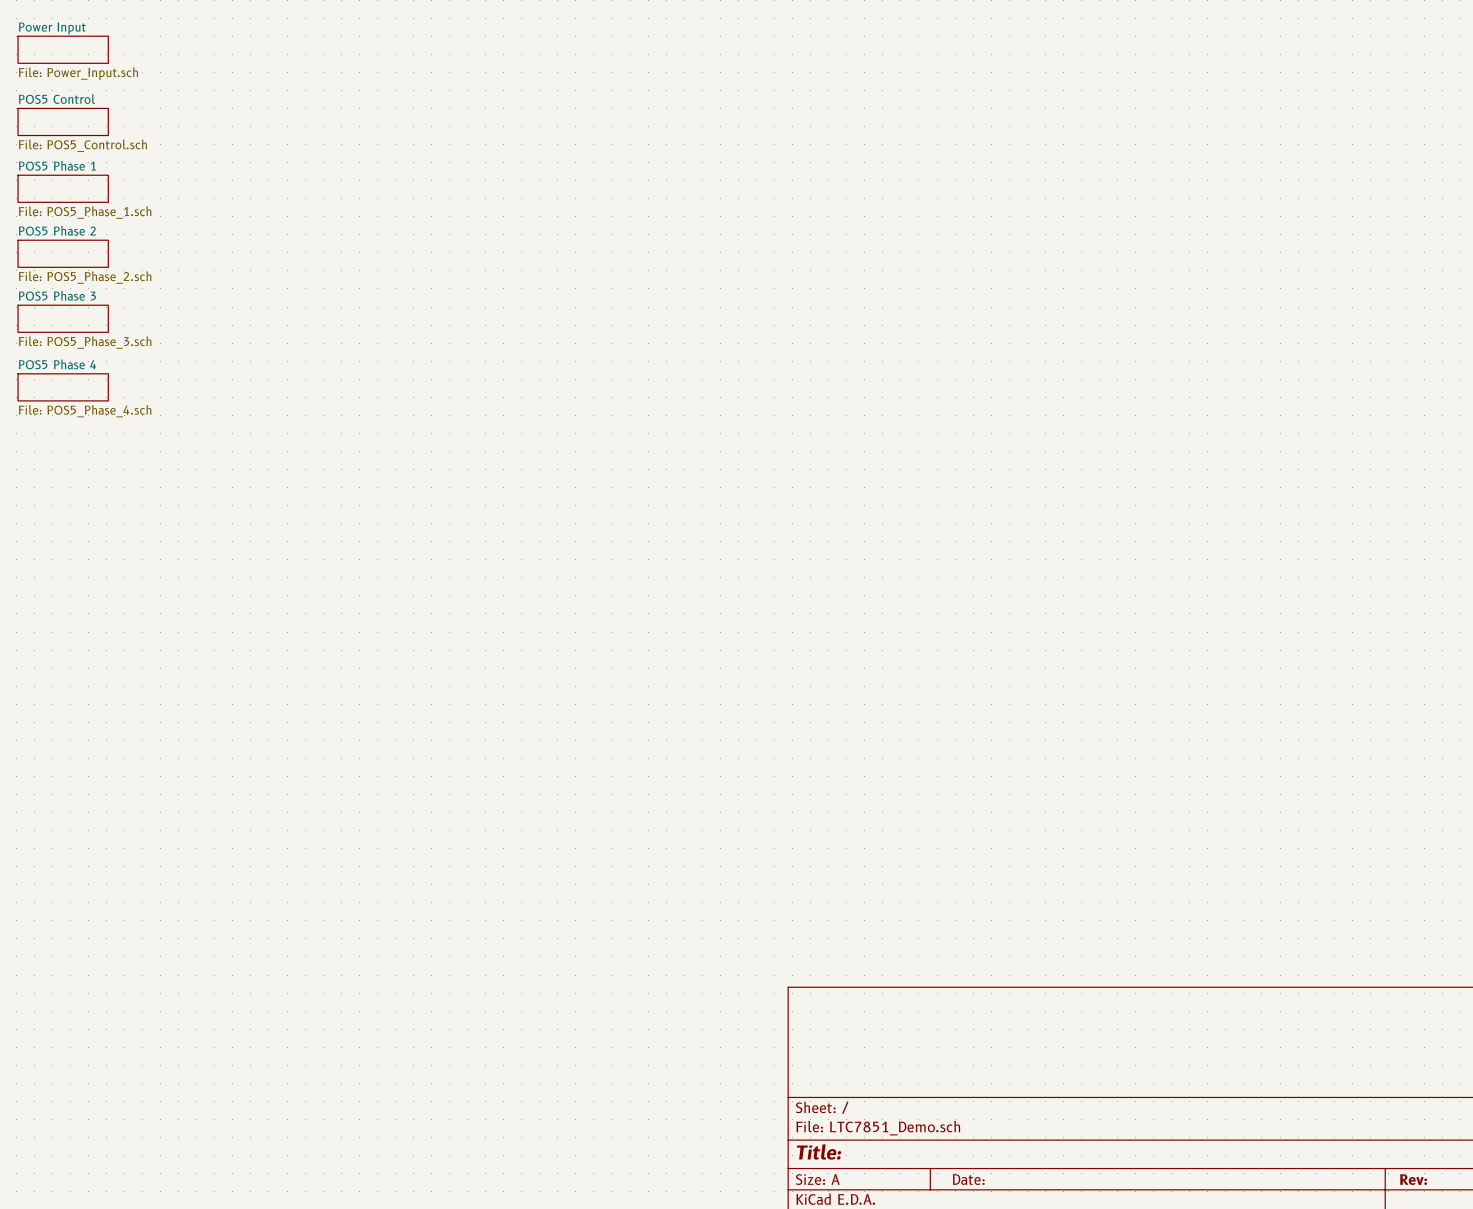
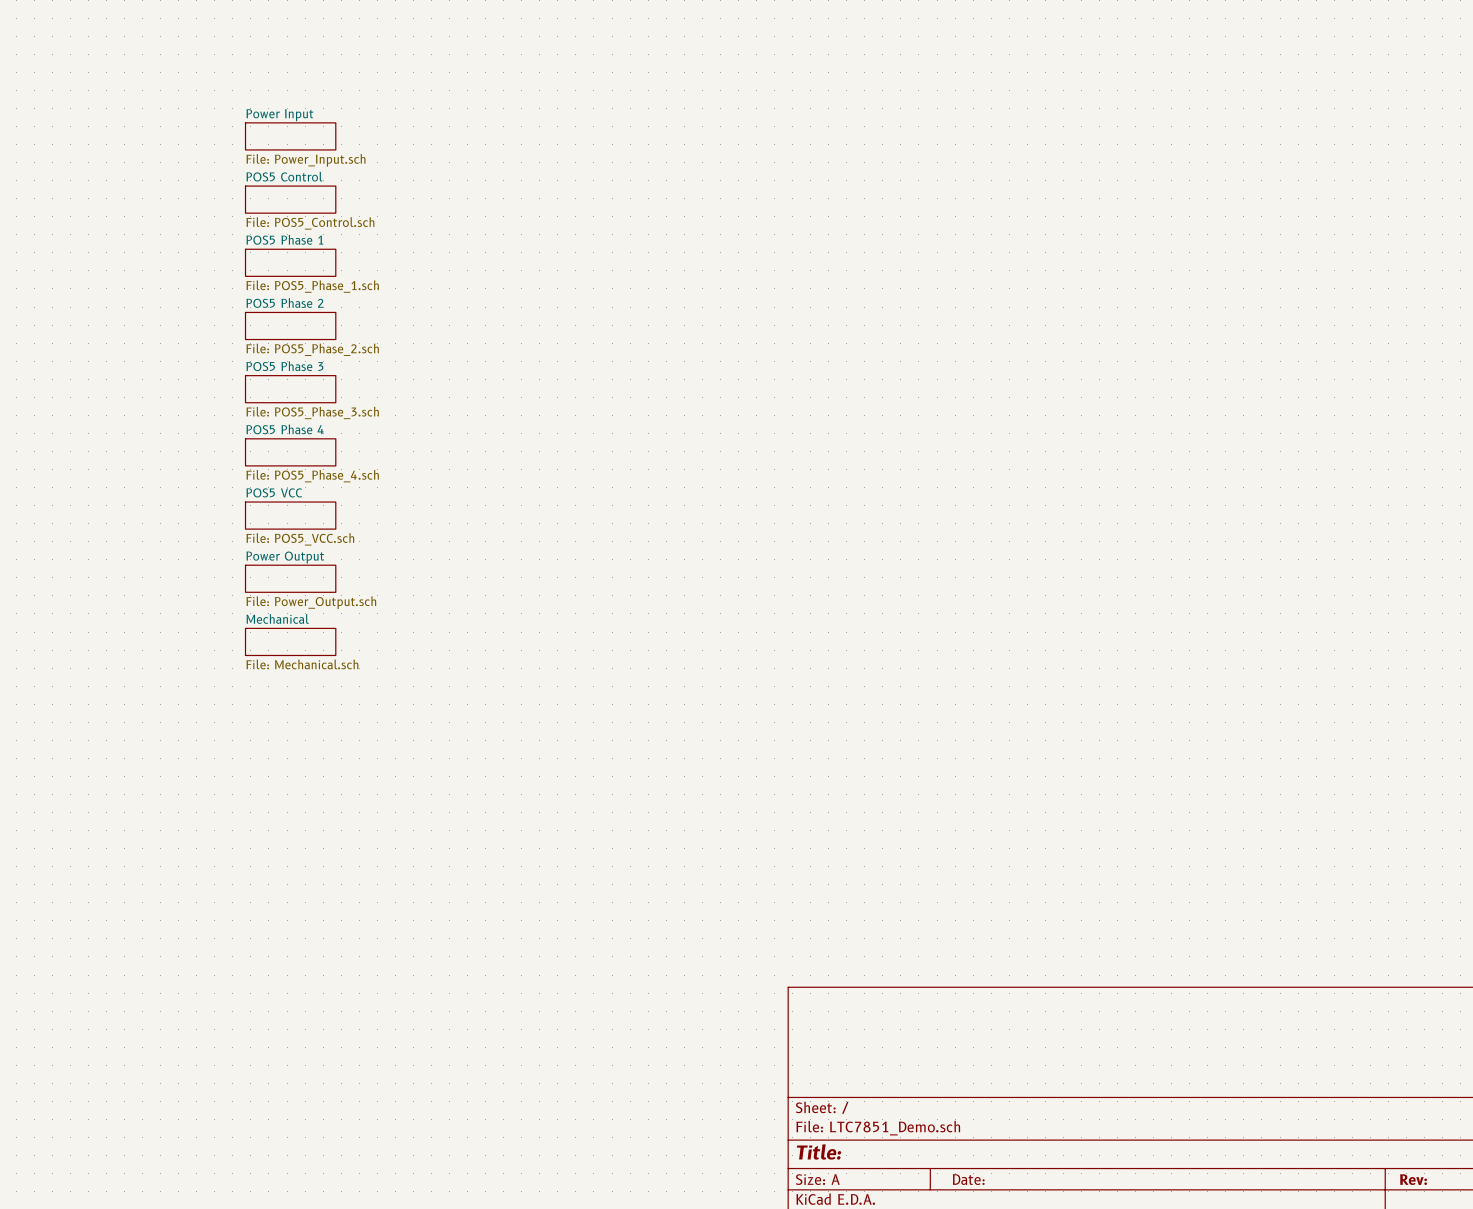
sheet Power Input: File: Power_Input.sch (63, 49) -> none
sheet POS5 Control position: (63, 121) -> (290, 199)
sheet Power Input: none -> File: Power_Input.sch (290, 136)
sheet POS5 Phase 1 position: (63, 188) -> (290, 262)
sheet POS5 Phase 2 position: (63, 253) -> (290, 325)
sheet POS5 Phase 3 position: (63, 318) -> (290, 389)
sheet POS5 Phase 4 position: (63, 387) -> (290, 452)
sheet POS5 VCC: none -> File: POS5_VCC.sch (290, 515)
sheet Power Output: none -> File: Power_Output.sch (290, 578)
sheet Mechanical: none -> File: Mechanical.sch (290, 641)

